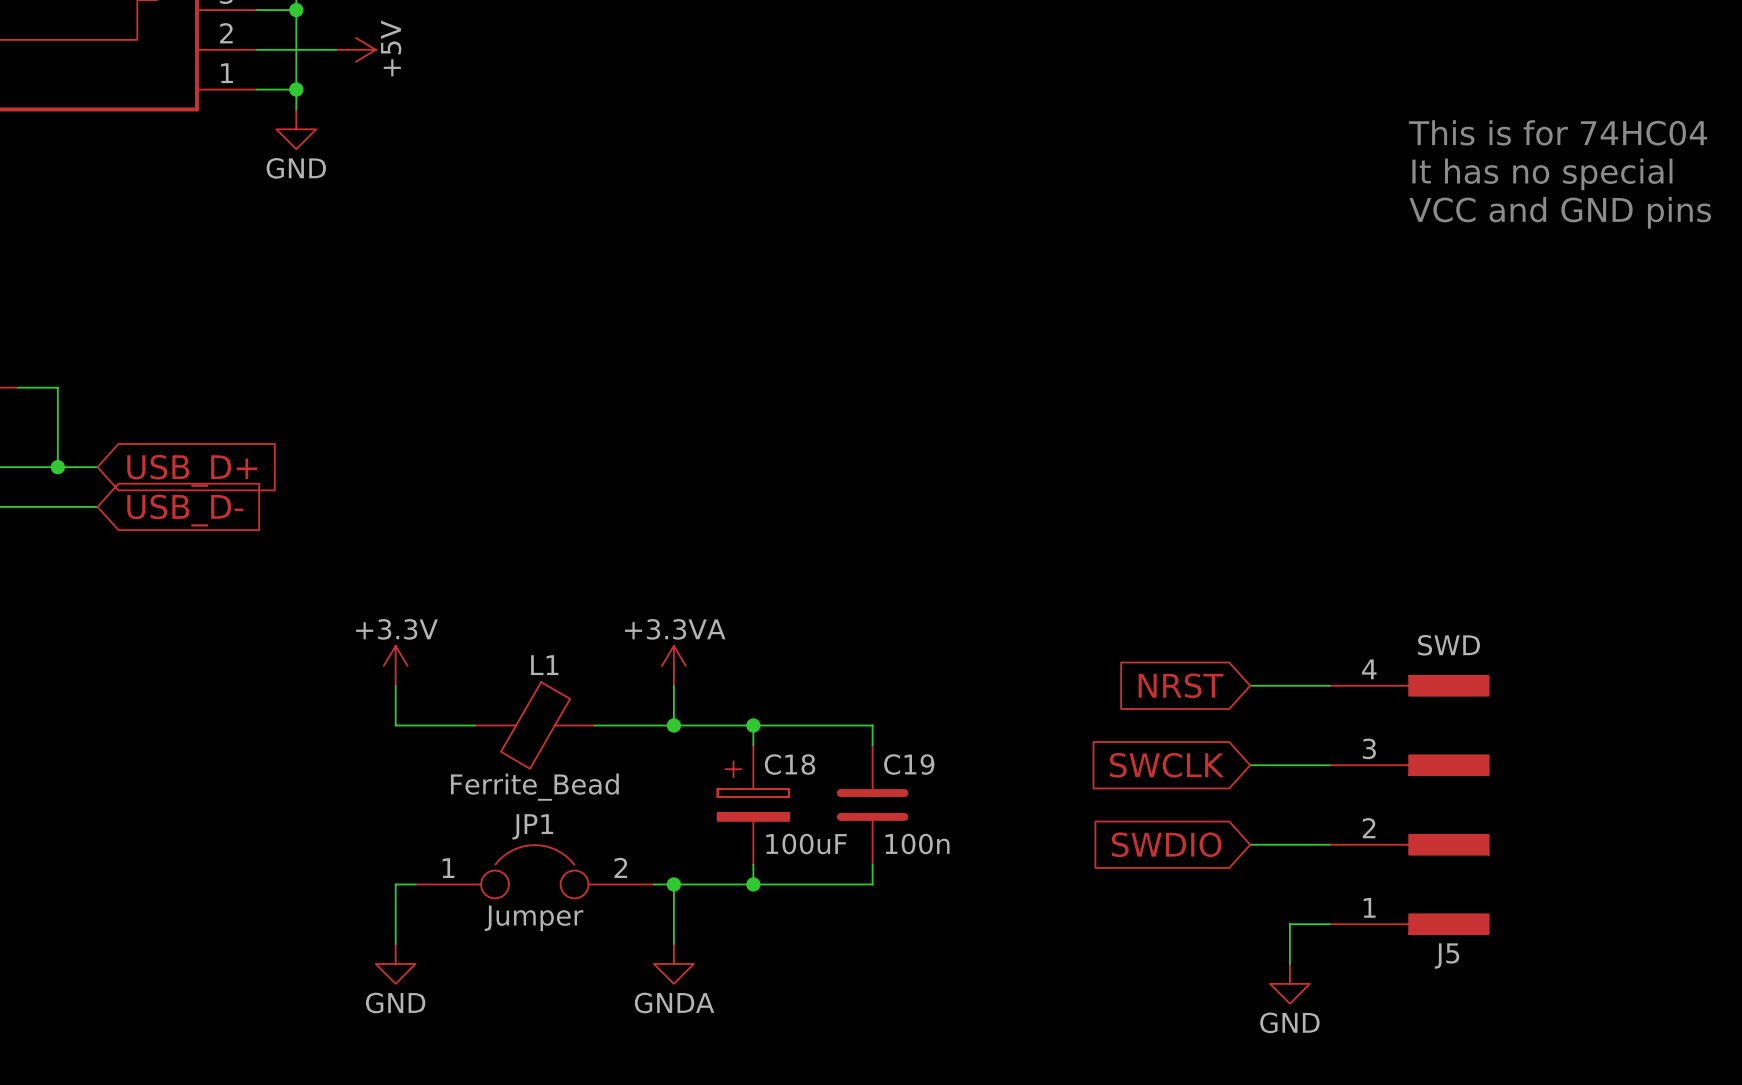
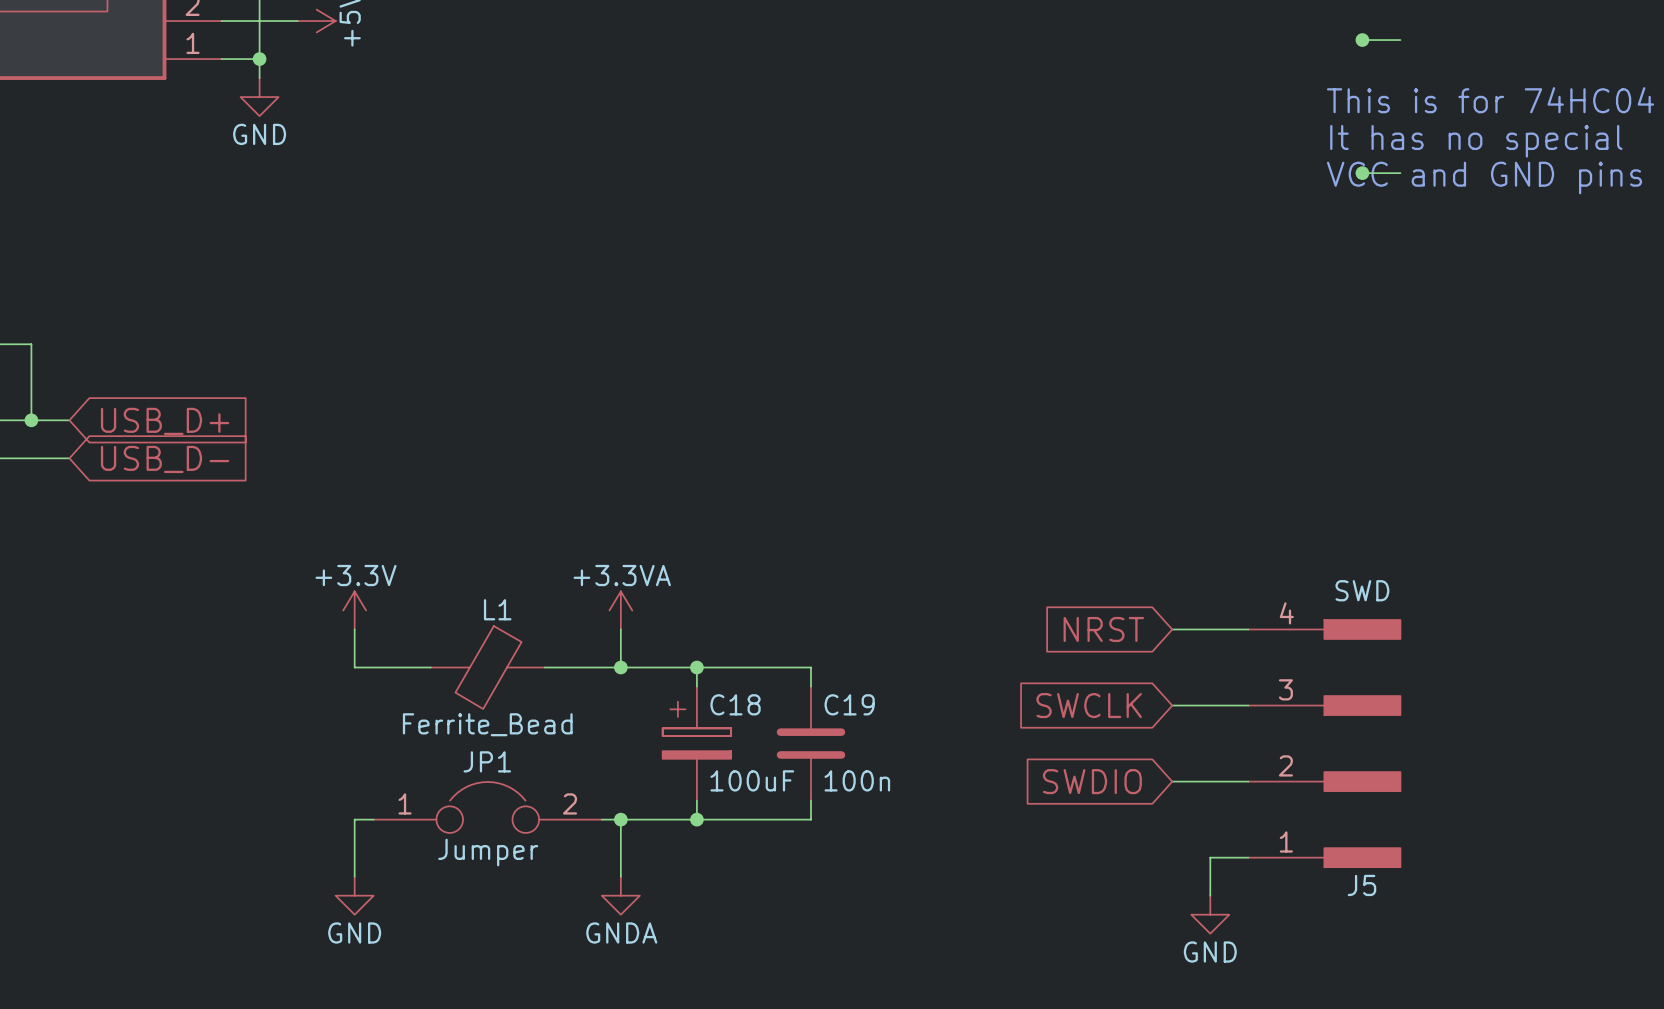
wire: none -> (1362, 40) (1400, 40)
junction: none -> (1362, 40)
wire: none -> (1362, 173) (1400, 173)
junction: none -> (1362, 173)

